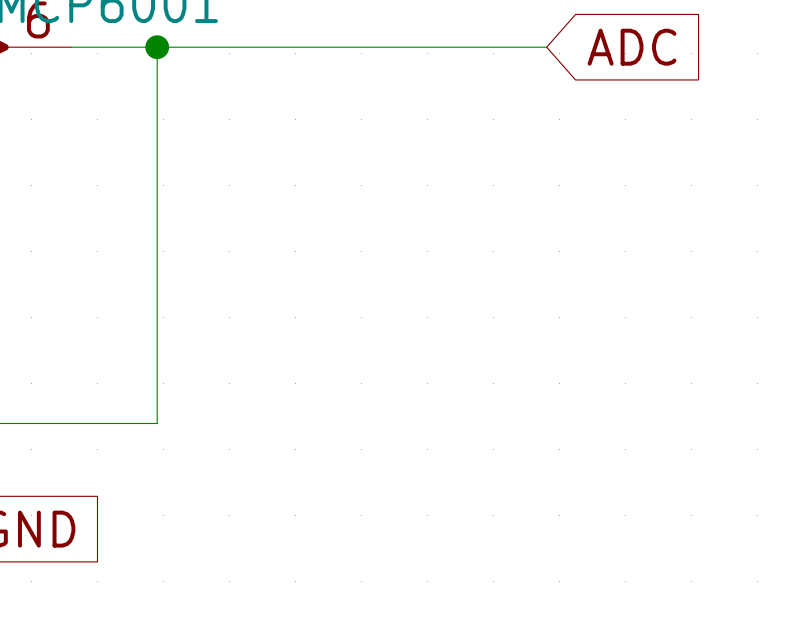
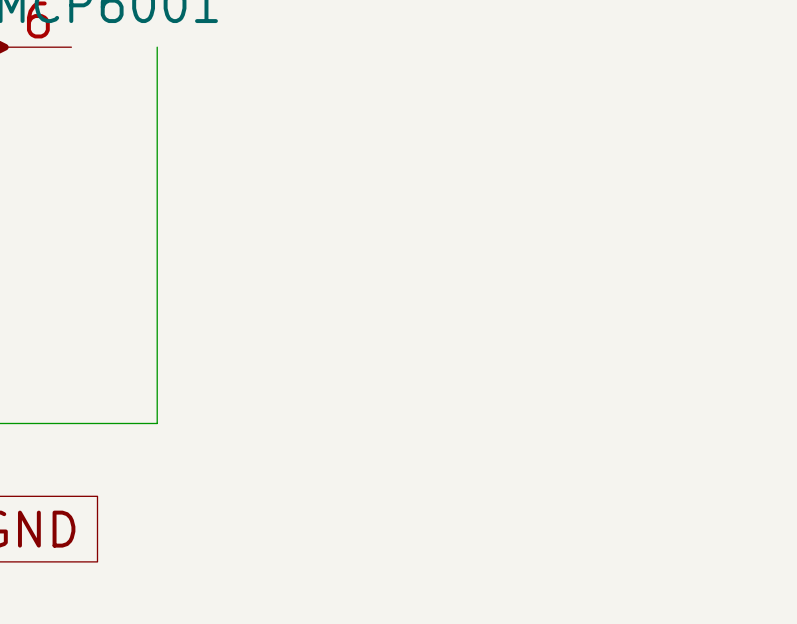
wire: (71, 47) (546, 47) -> none
junction: (157, 47) -> none
global label: ADC (632, 47) -> none

